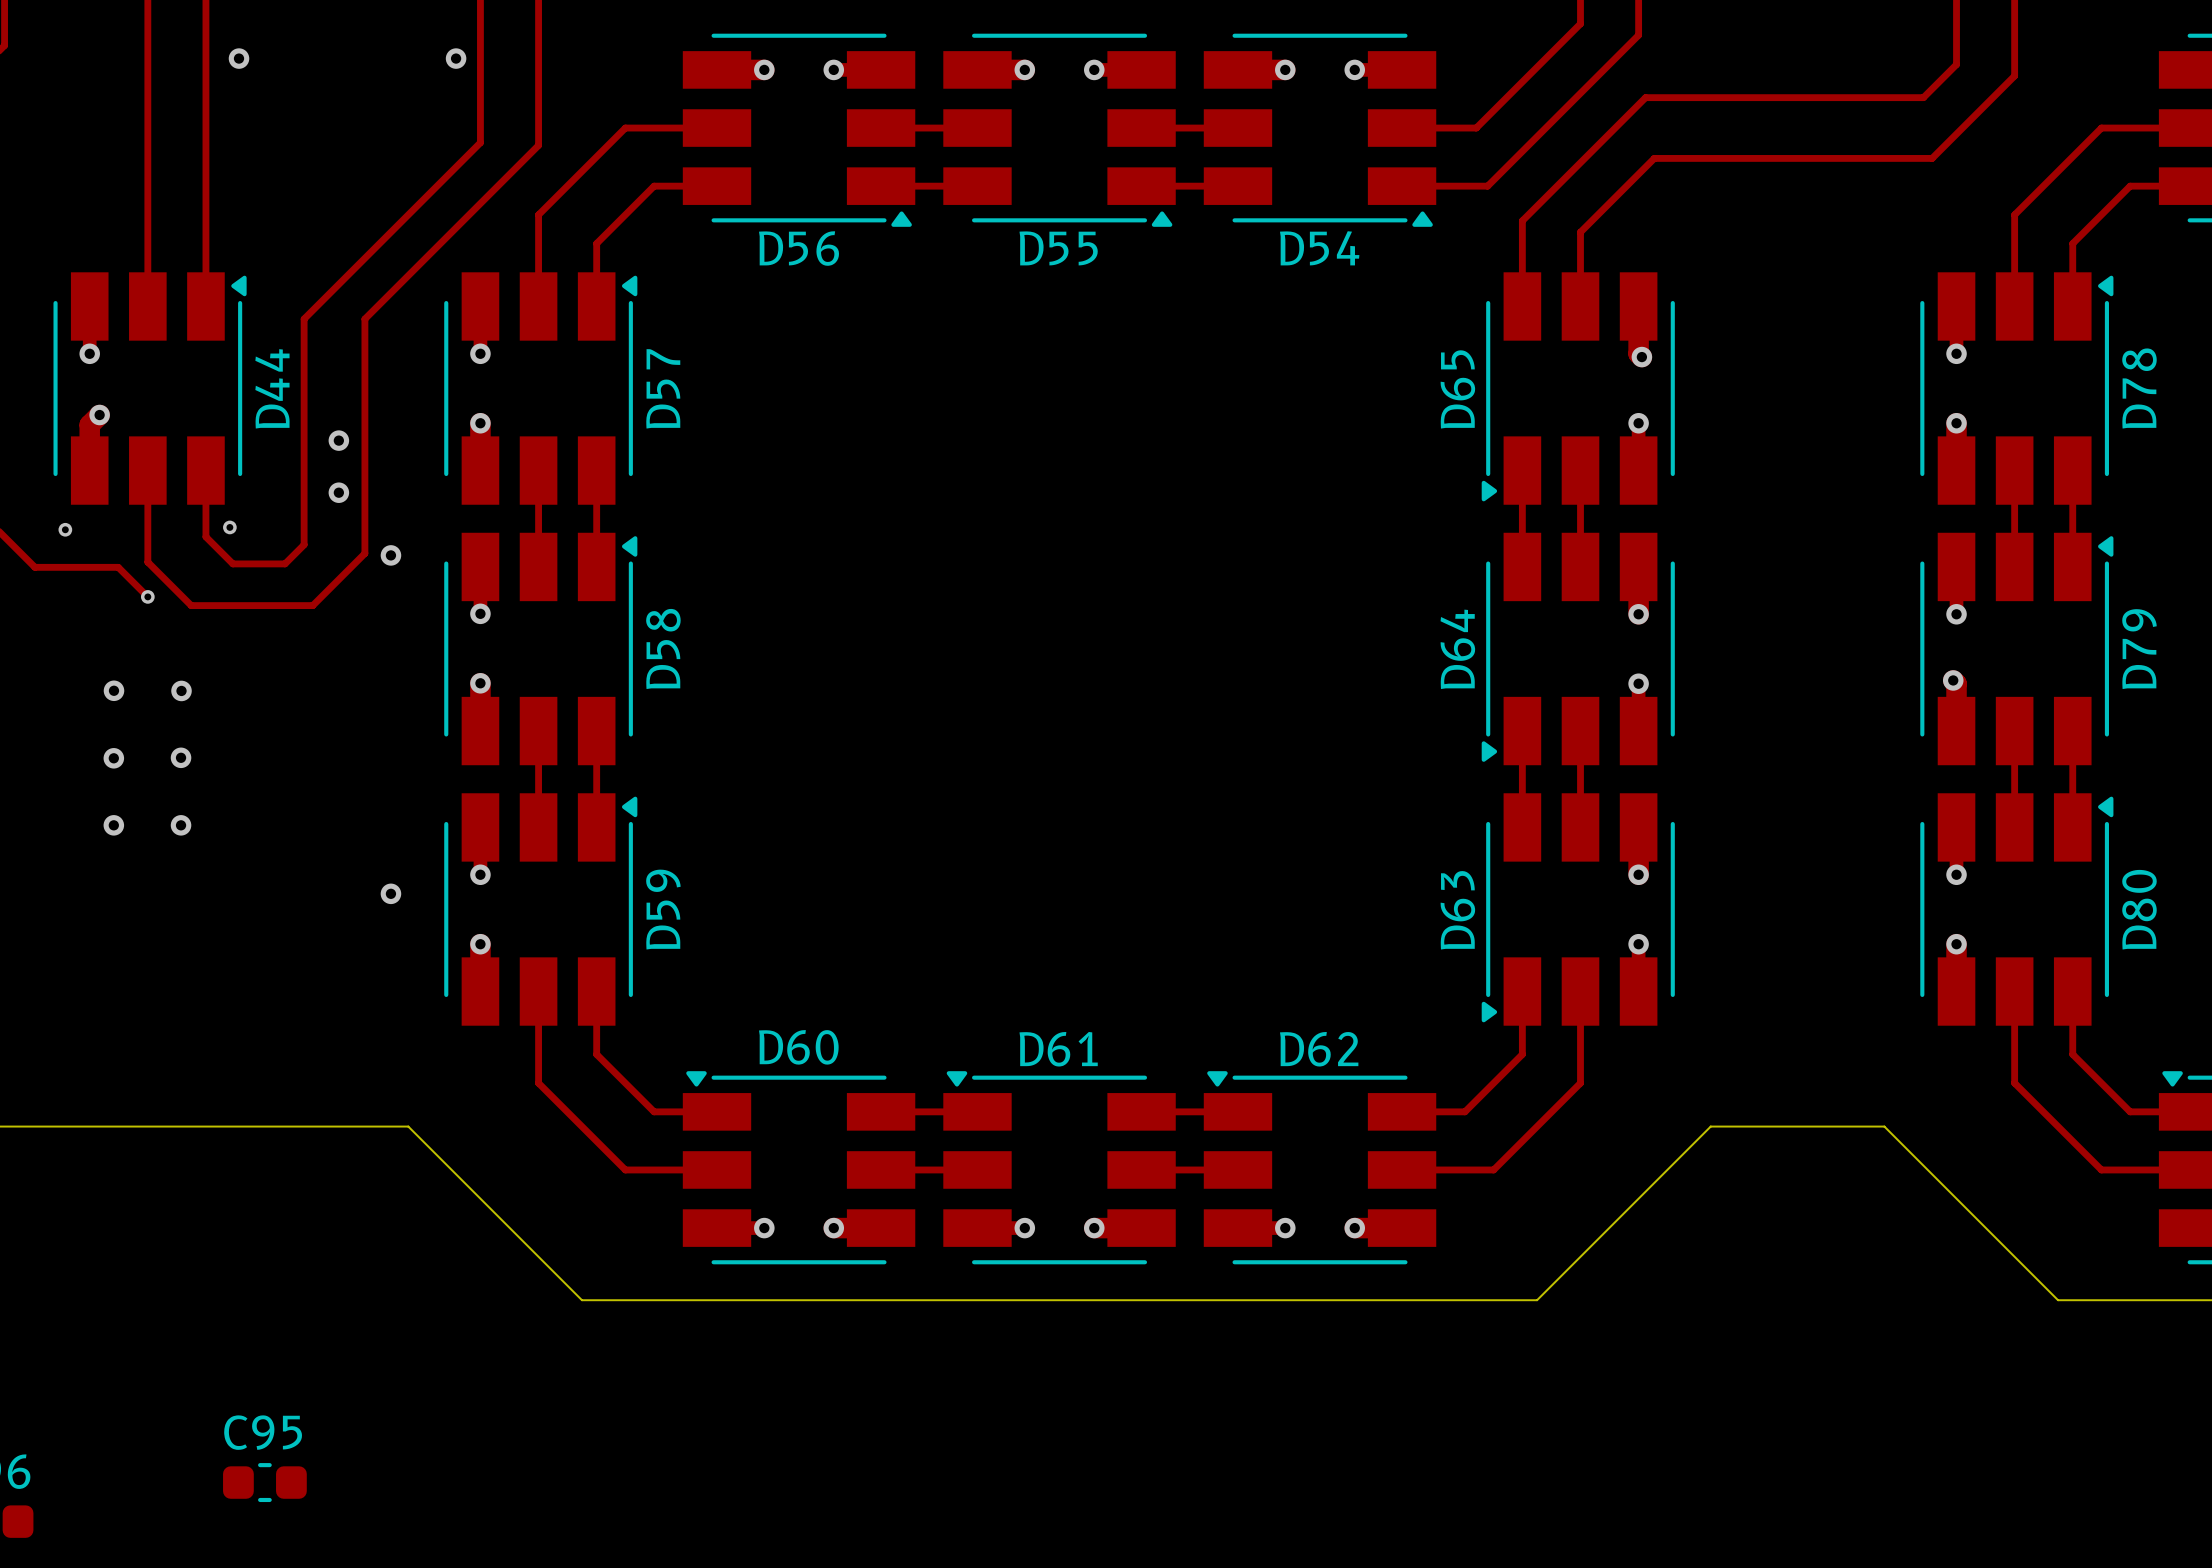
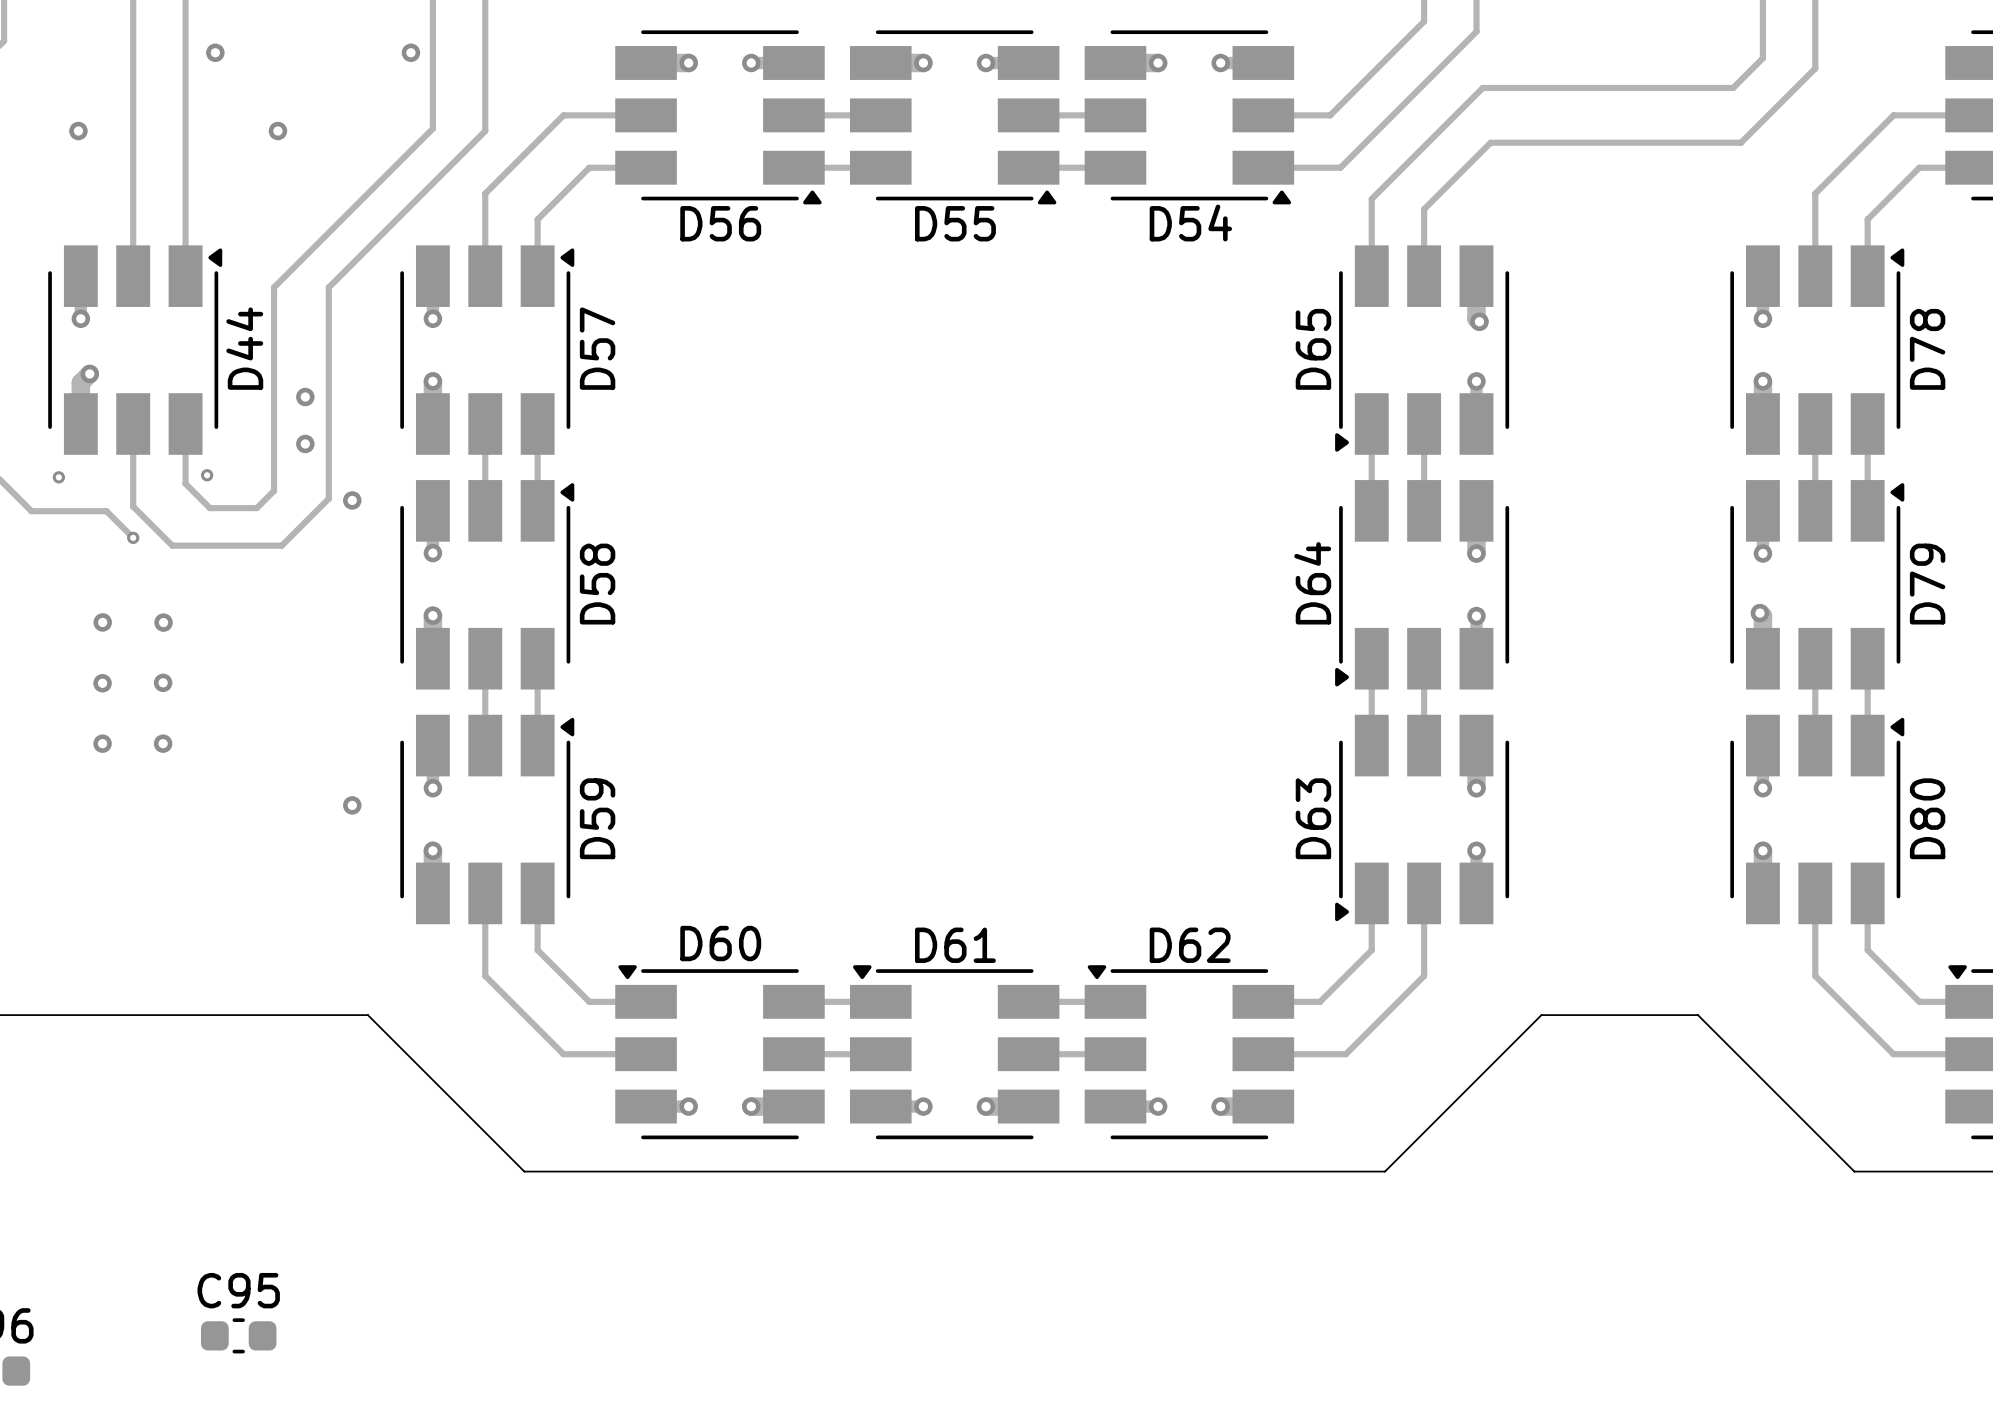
via: none -> (78, 131)
via: none -> (277, 131)

